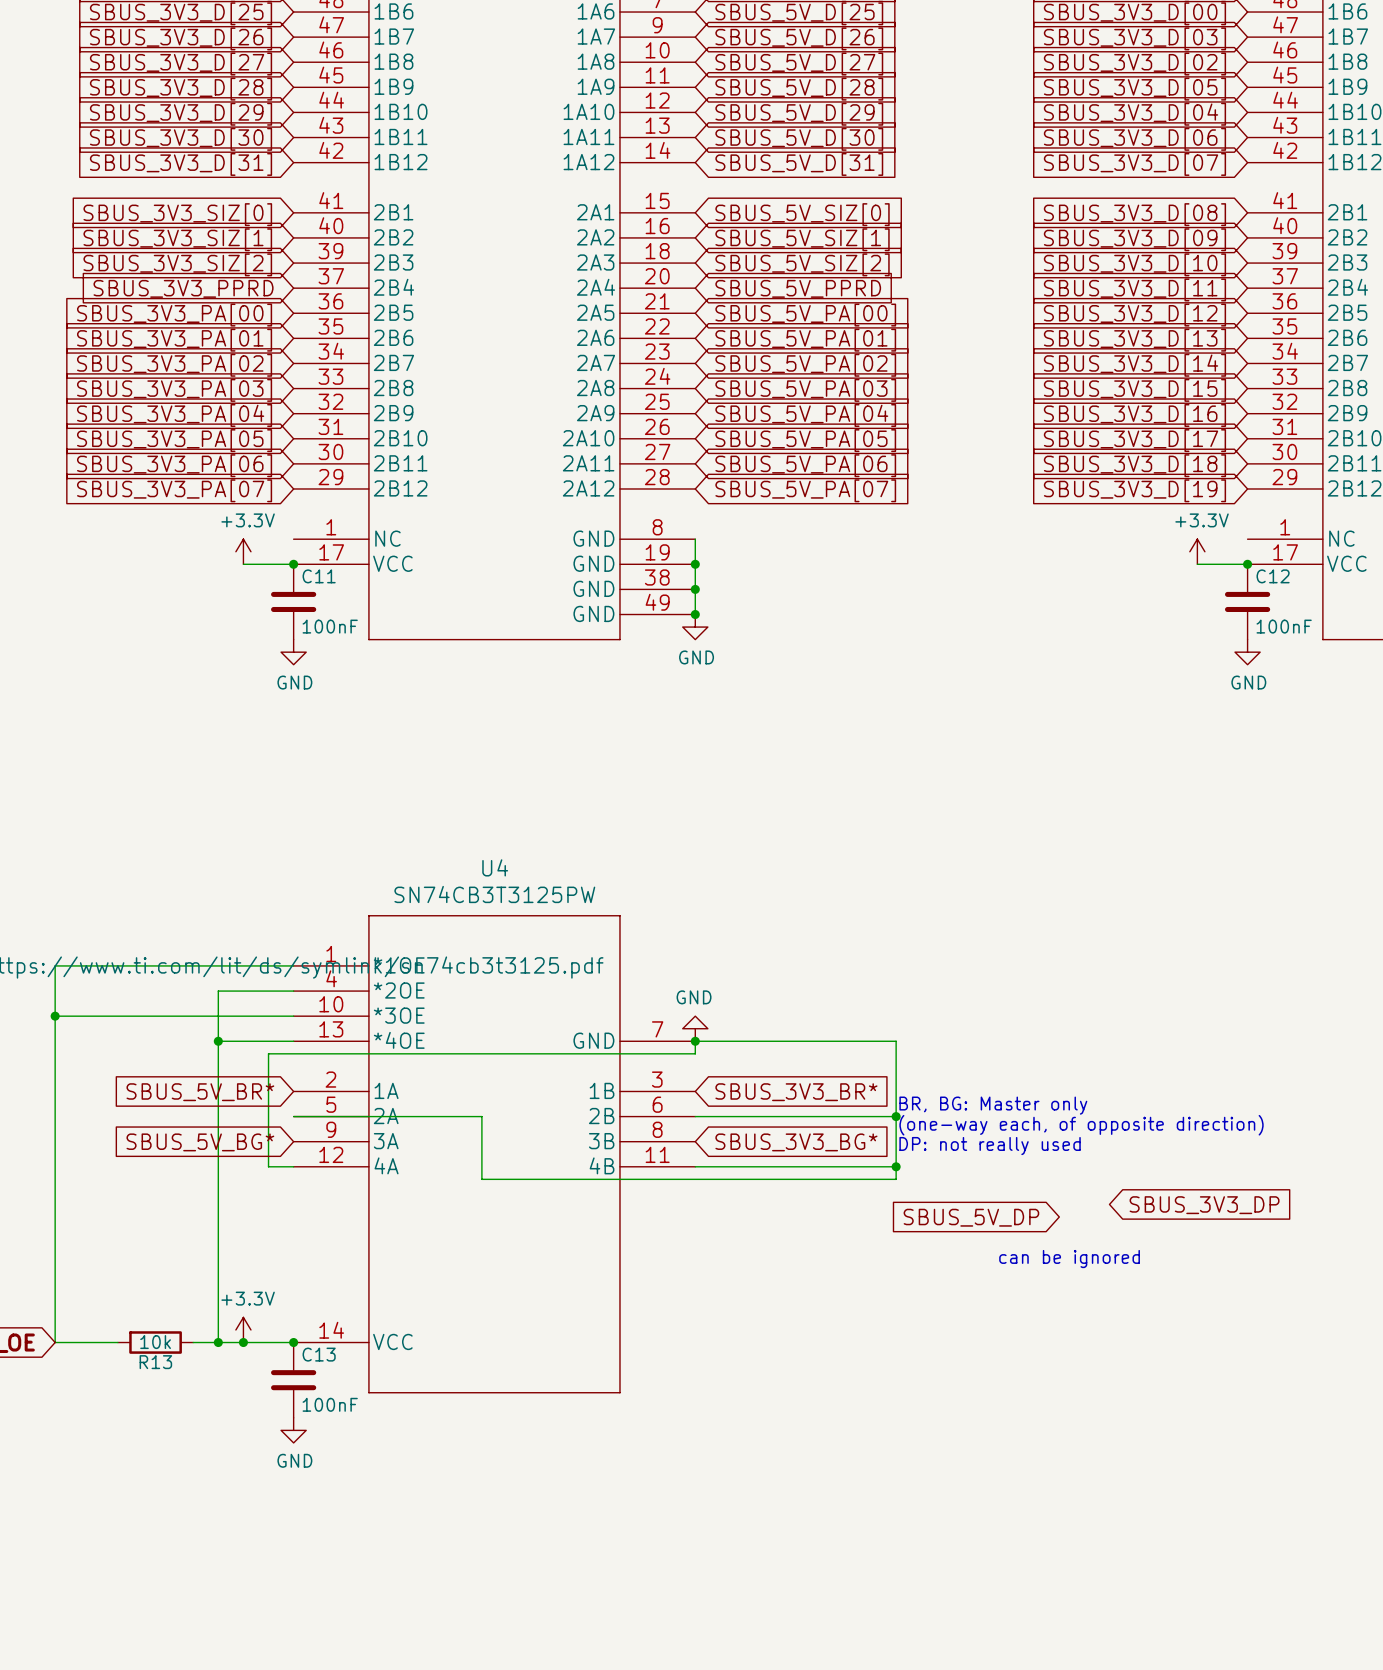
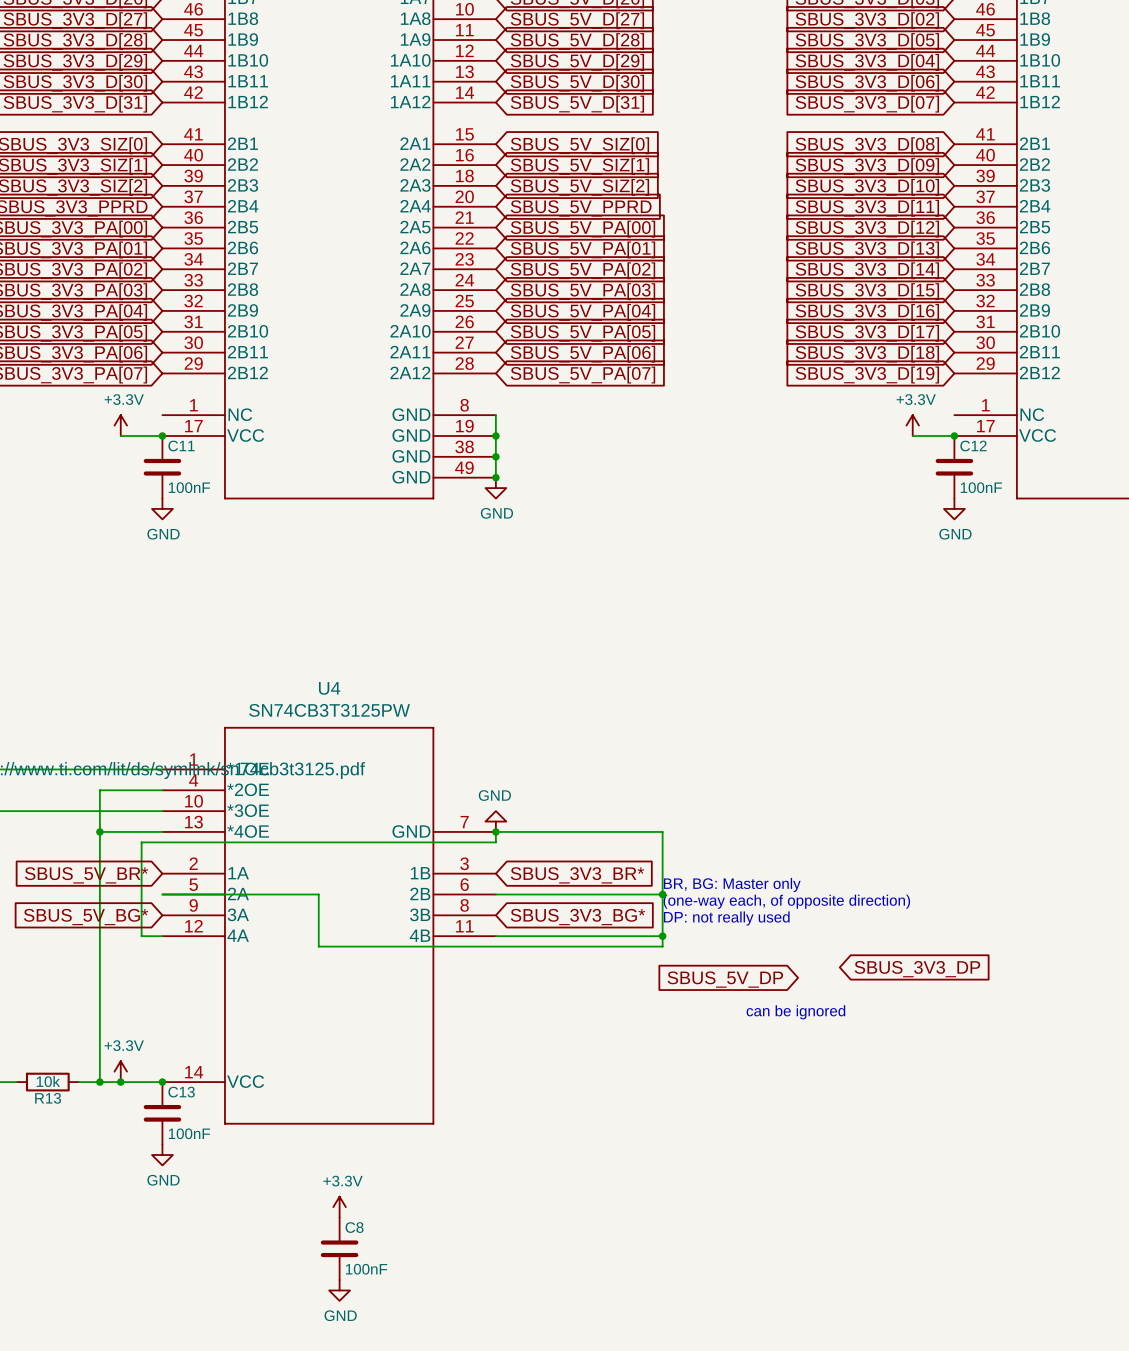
power symbol: none -> +3.3V (339, 1207)
C8: none -> 100nF (339, 1248)
power symbol: none -> GND (339, 1290)

